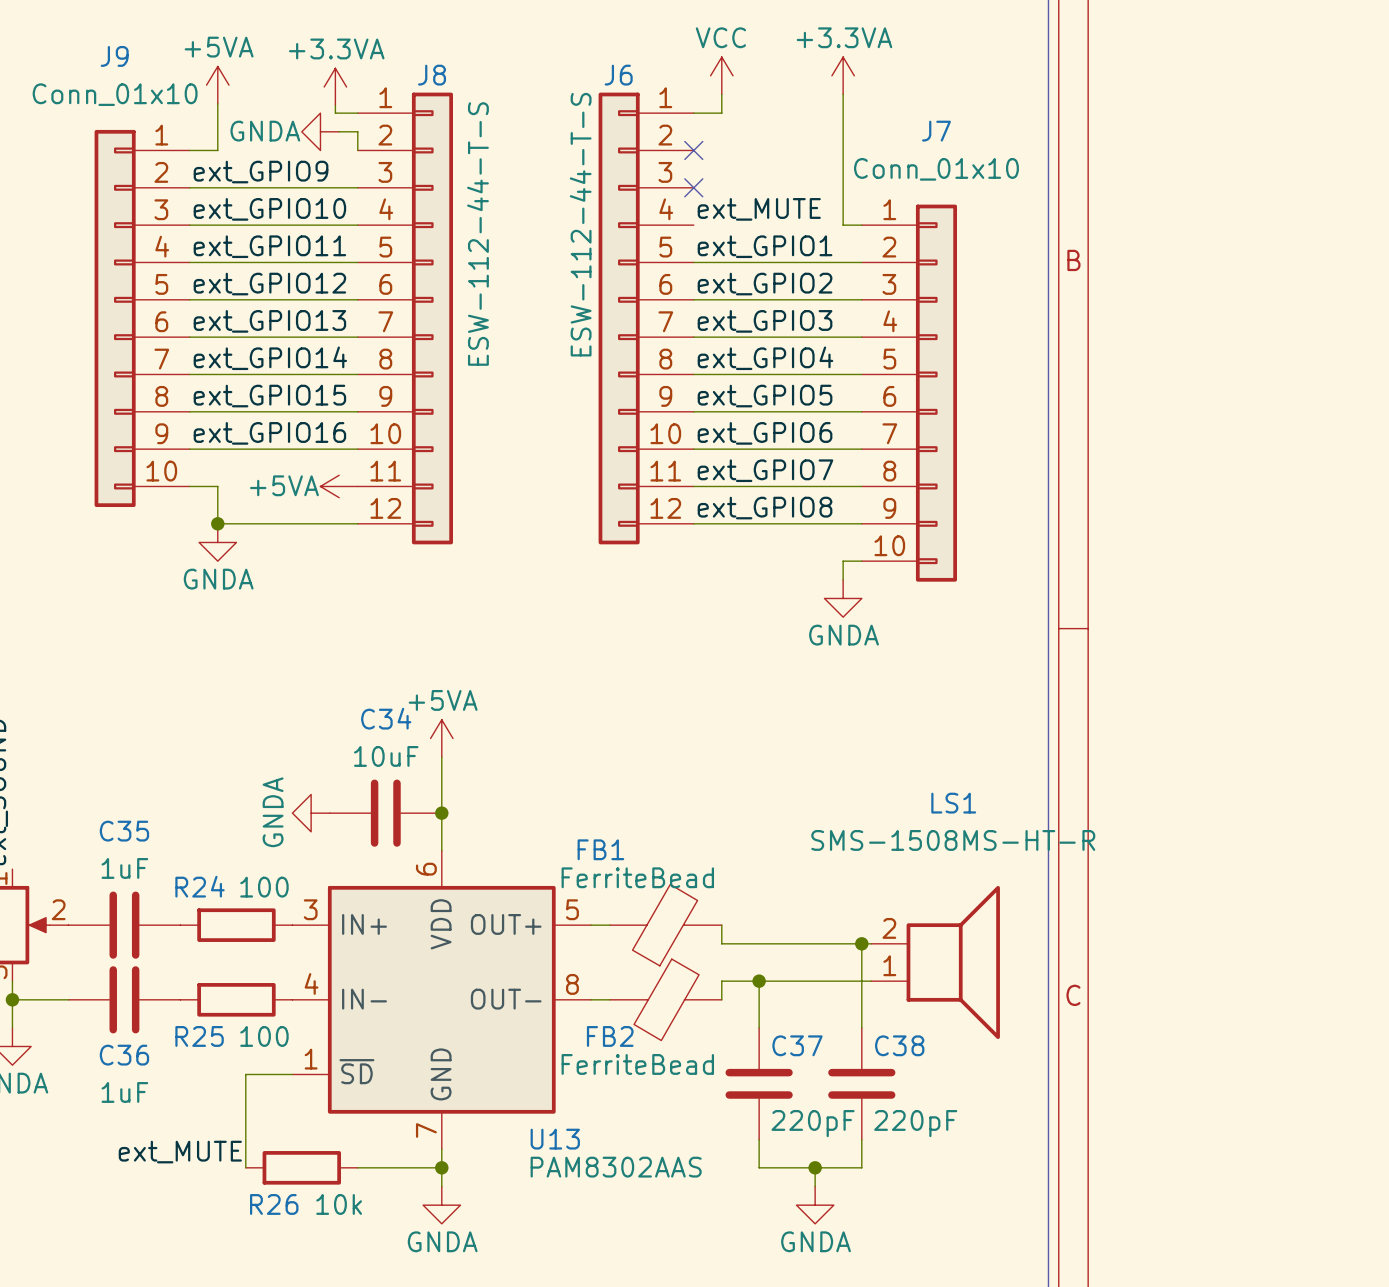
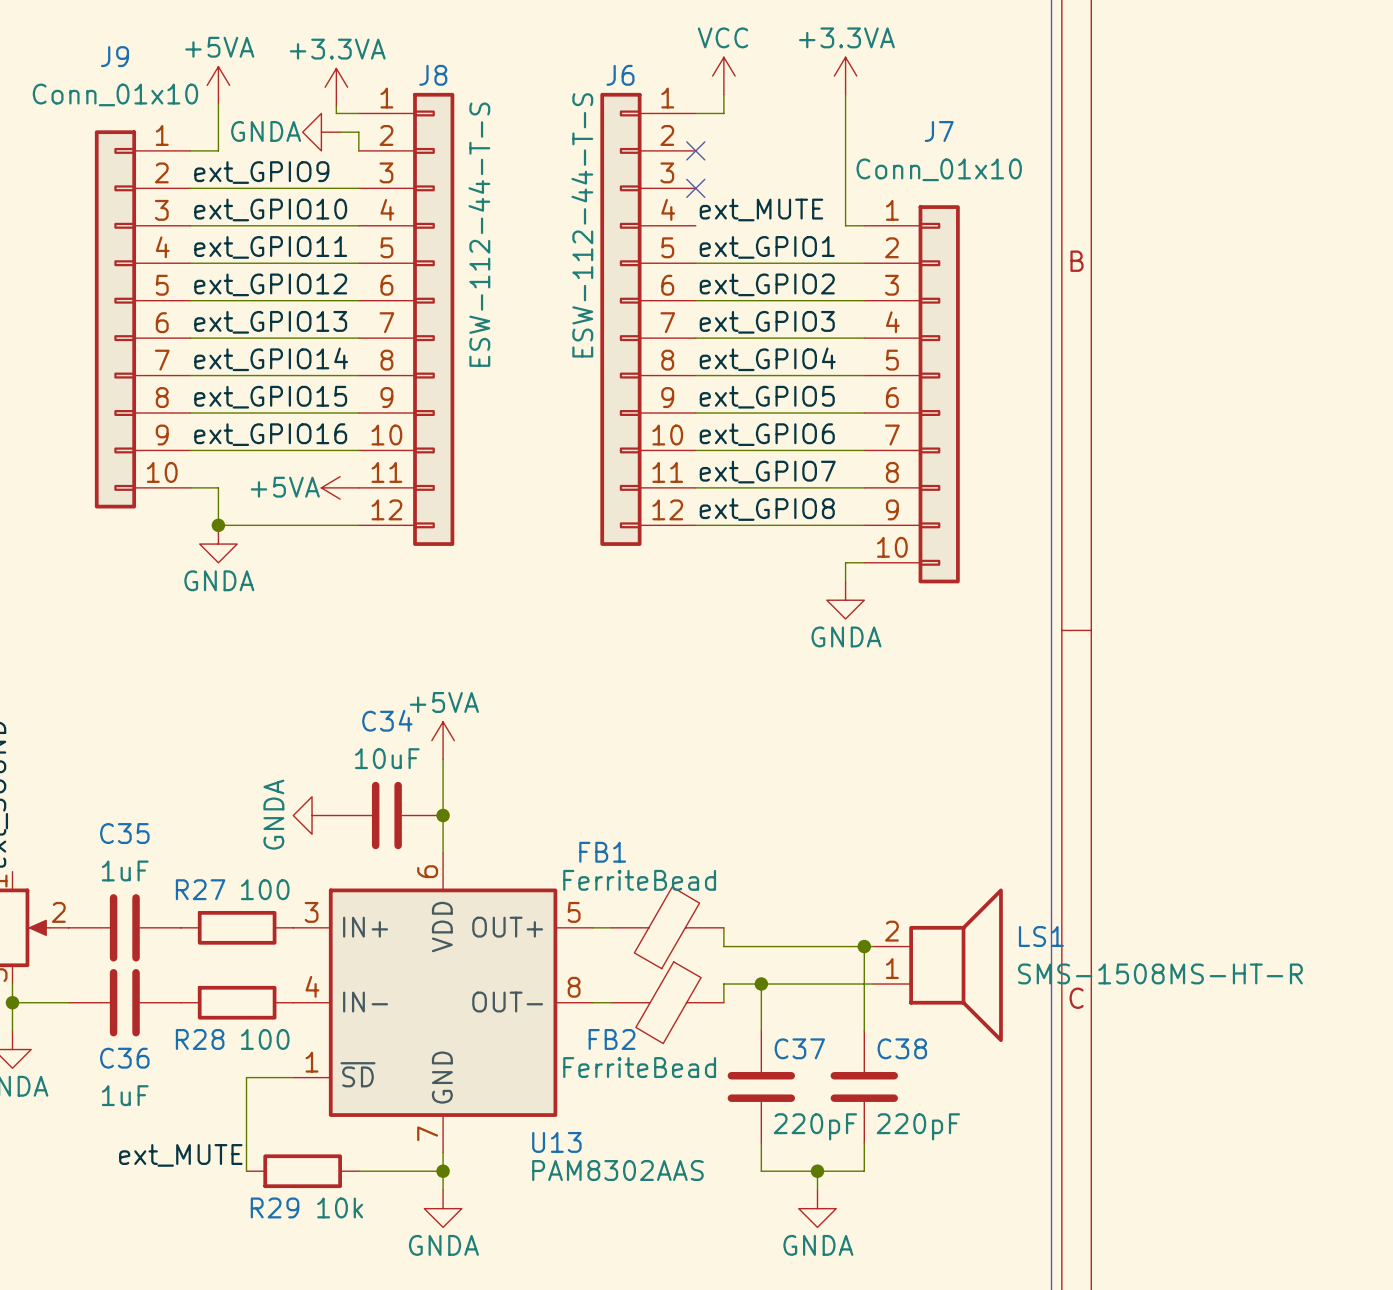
LS1 name position: LS1 (953, 803) -> LS1 (1041, 936)
LS1 value position: SMS-1508MS-HT-R (953, 840) -> SMS-1508MS-HT-R (1160, 973)
R24 name: R24 (200, 886) -> R27 (200, 889)
R25 name: R25 (199, 1036) -> R28 (200, 1039)
R26 name: R26 (274, 1204) -> R29 (275, 1207)

